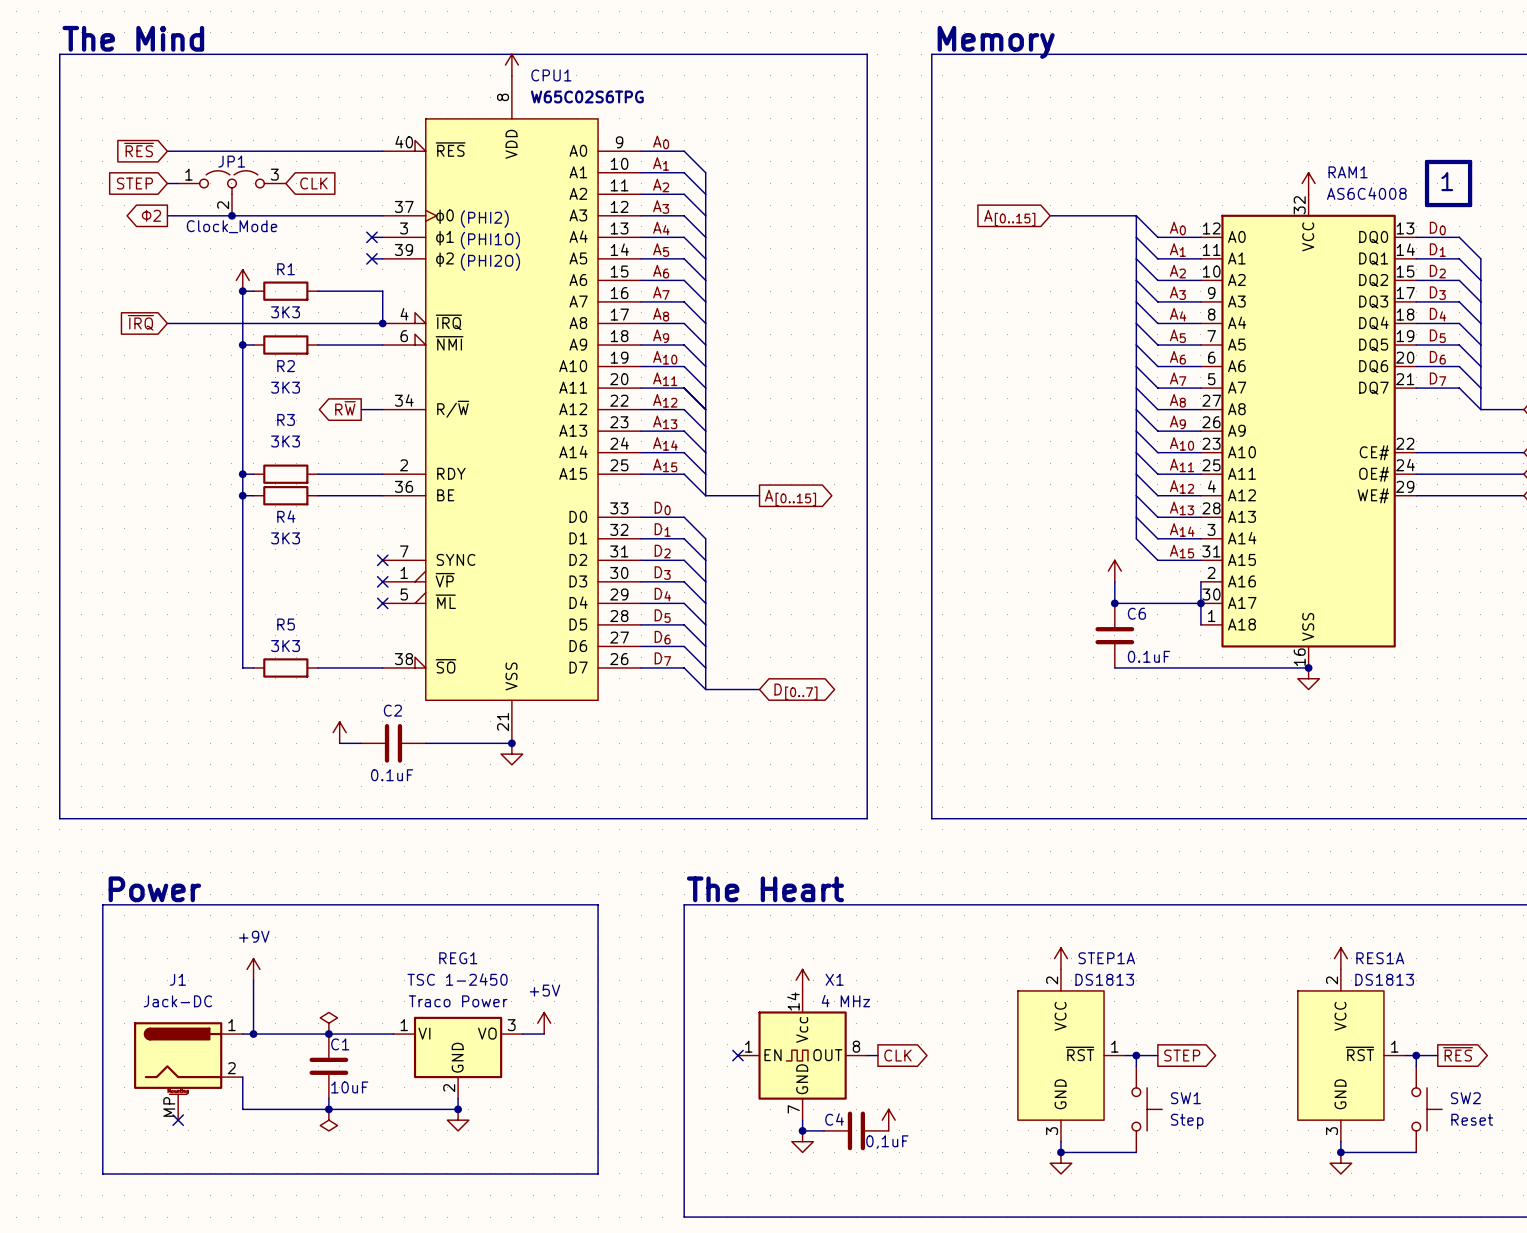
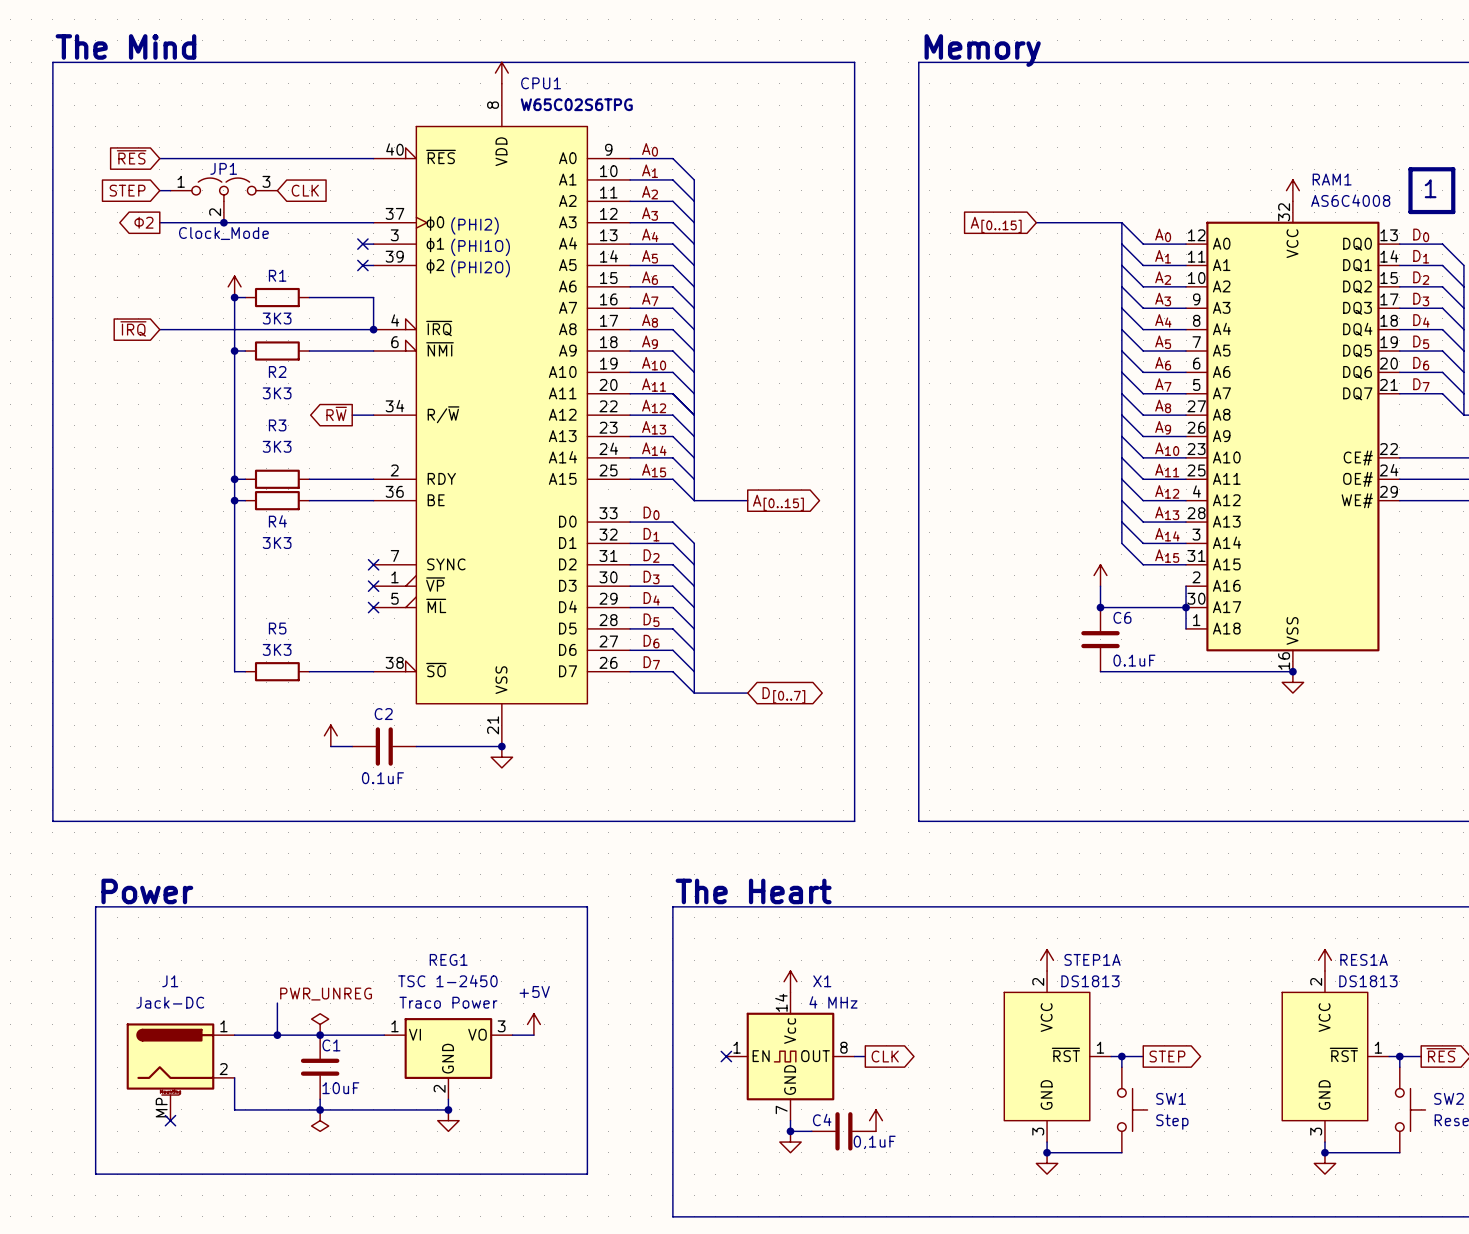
power symbol: +9V (253, 969) -> none
wire: (253, 980) (253, 1034) -> none
label: none -> PWR_UNREG (326, 994)
wire: none -> (277, 1003) (277, 1035)
junction position: (253, 1034) -> (277, 1035)

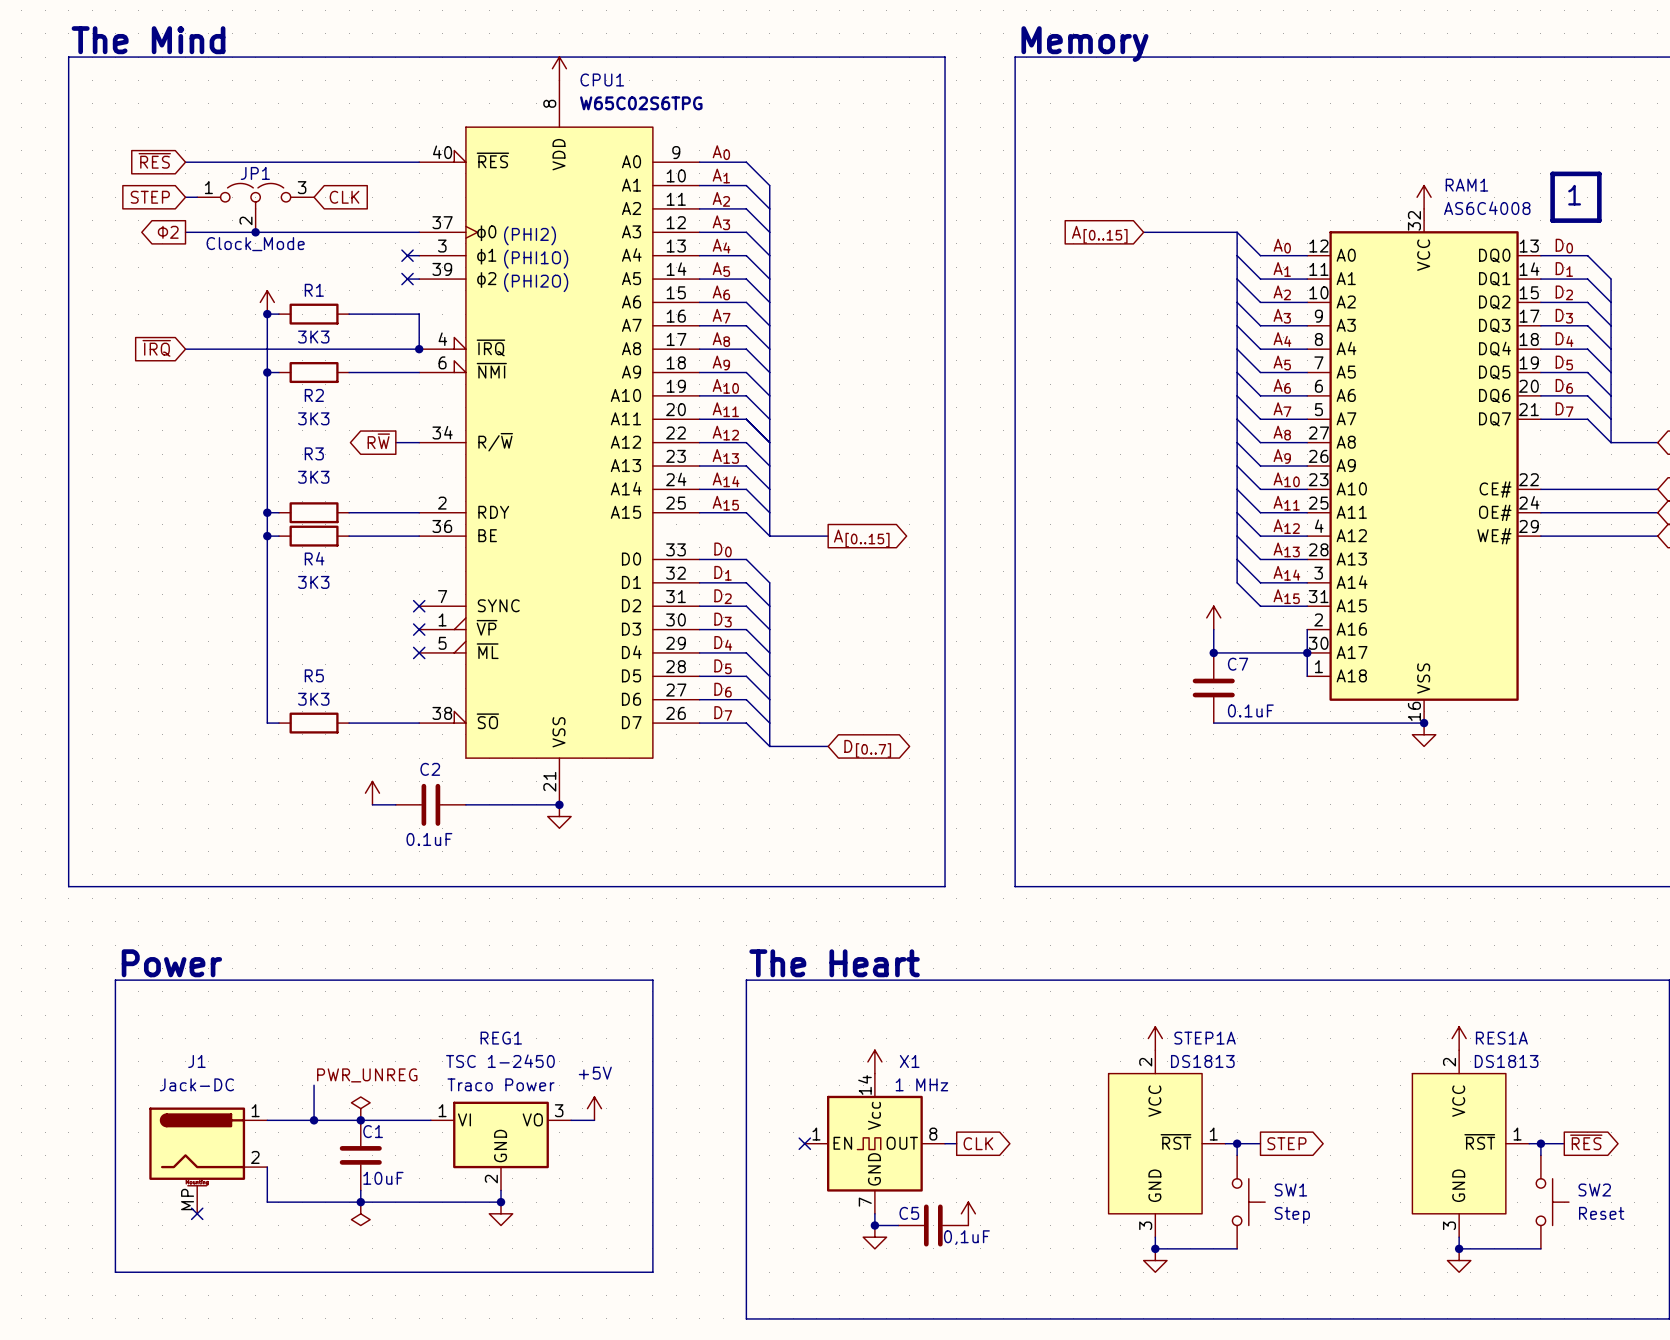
C6 name: C6 (1122, 617) -> C7 (1238, 664)
X1 value: 4 MHz (833, 1002) -> 1 MHz (921, 1084)
C4 name: C4 (822, 1120) -> C5 (909, 1213)

